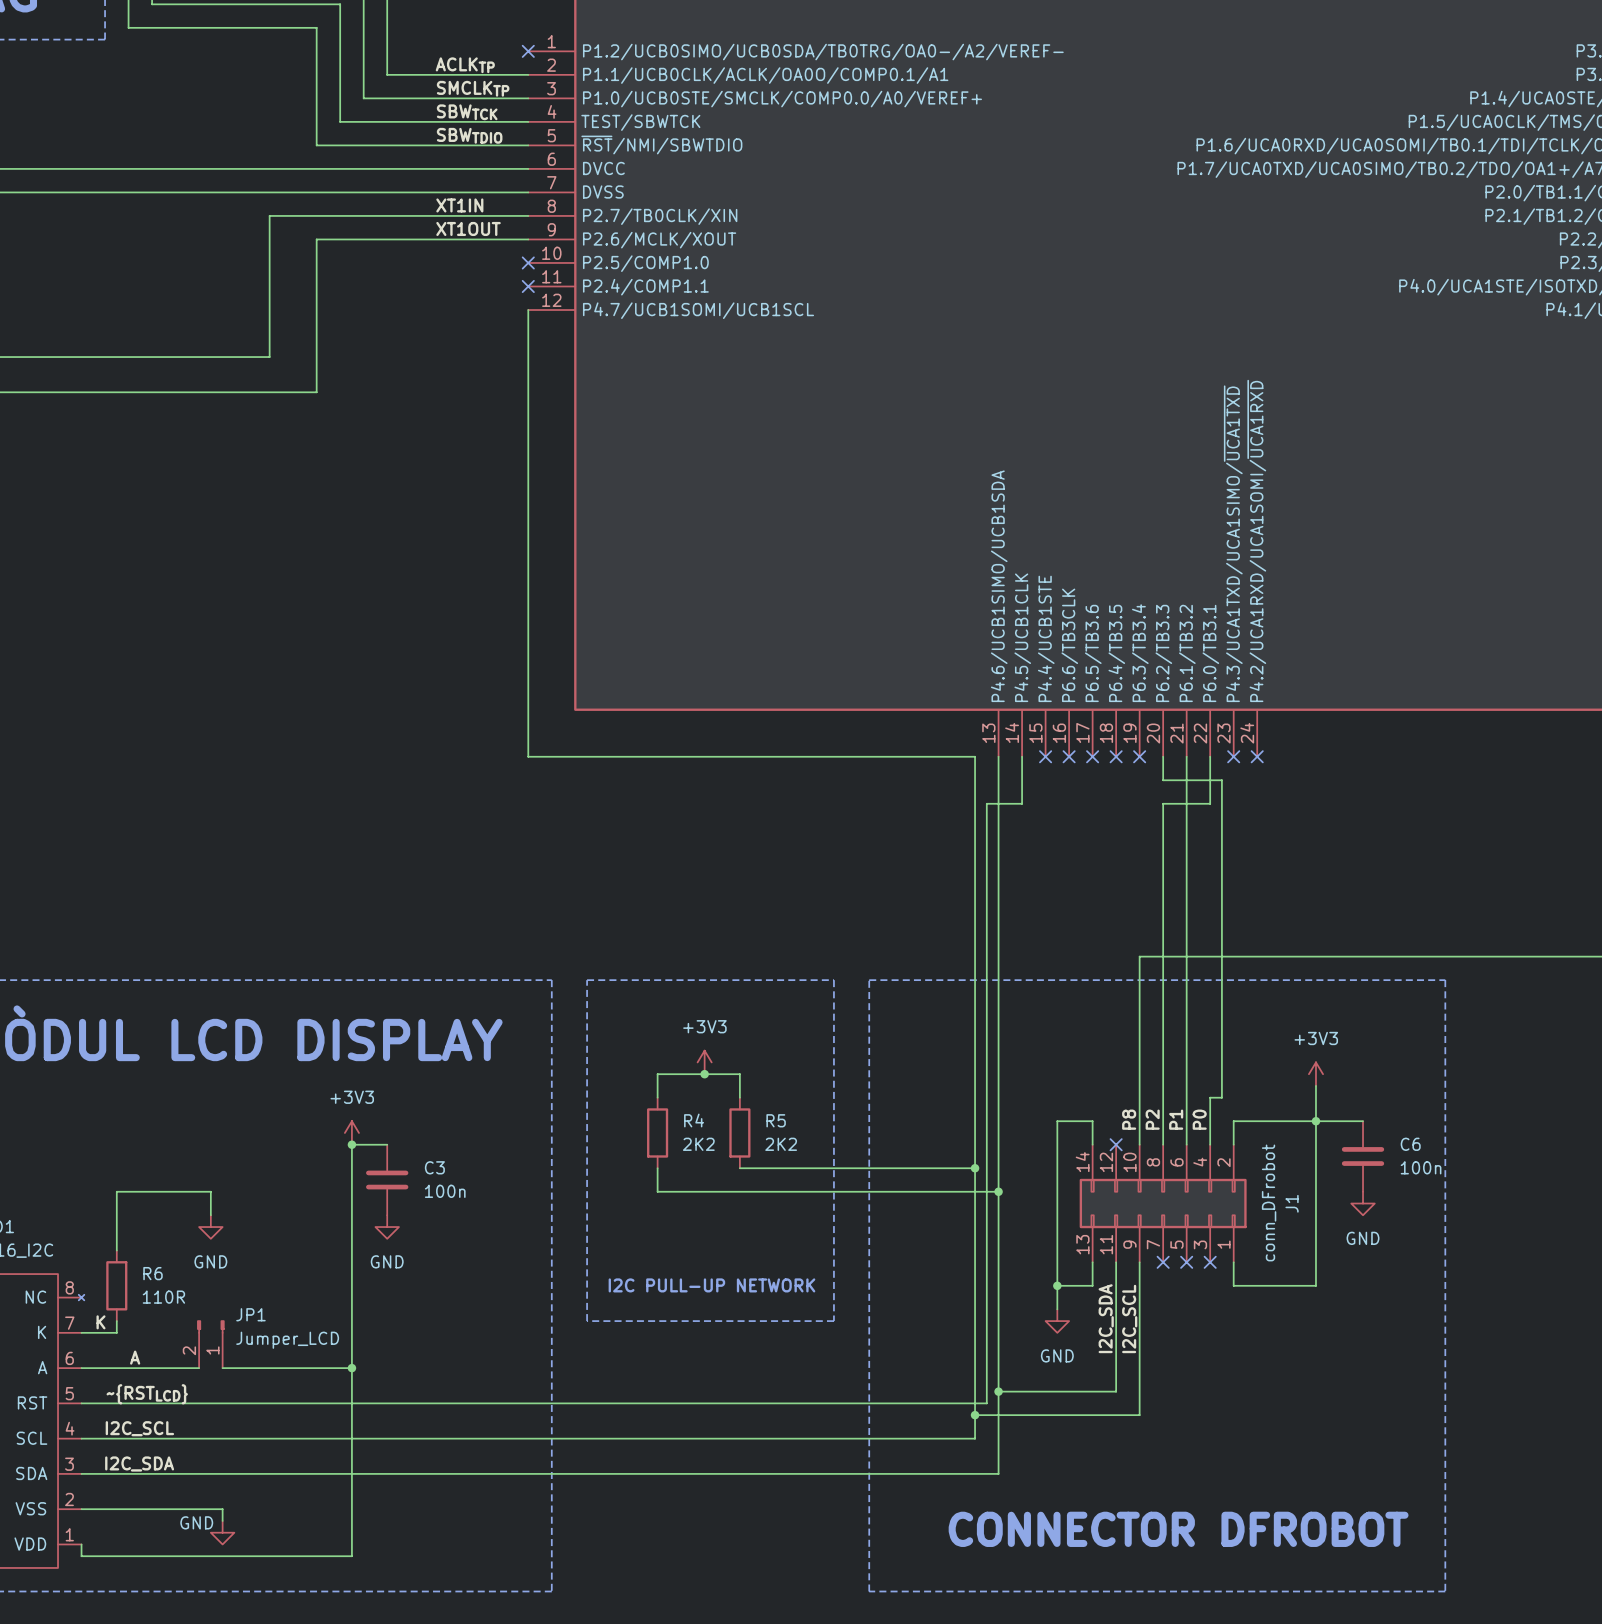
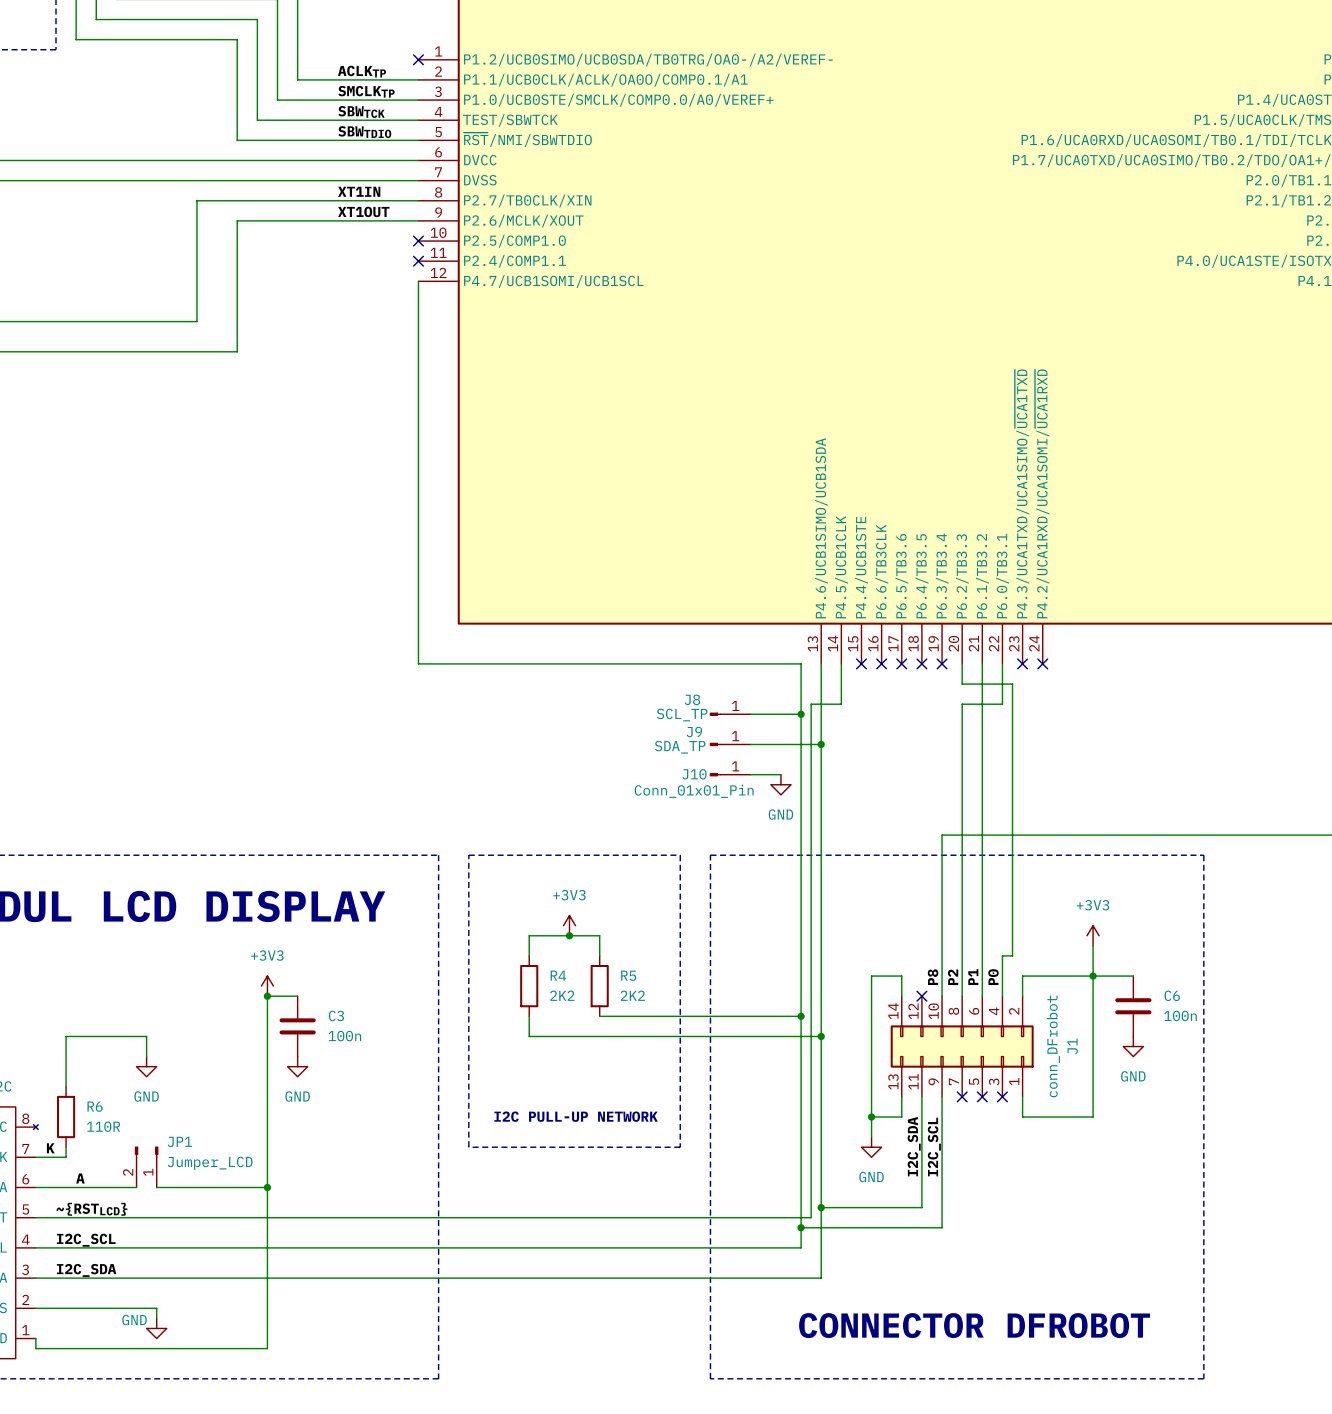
J8: none -> SCL_TP (730, 714)
wire: none -> (750, 714) (801, 714)
junction: none -> (801, 714)
J9: none -> SDA_TP (730, 744)
wire: none -> (750, 744) (821, 744)
junction: none -> (821, 744)
J10: none -> Conn_01x01_Pin (730, 774)
wire: none -> (750, 774) (780, 774)
power symbol: none -> GND (780, 784)

